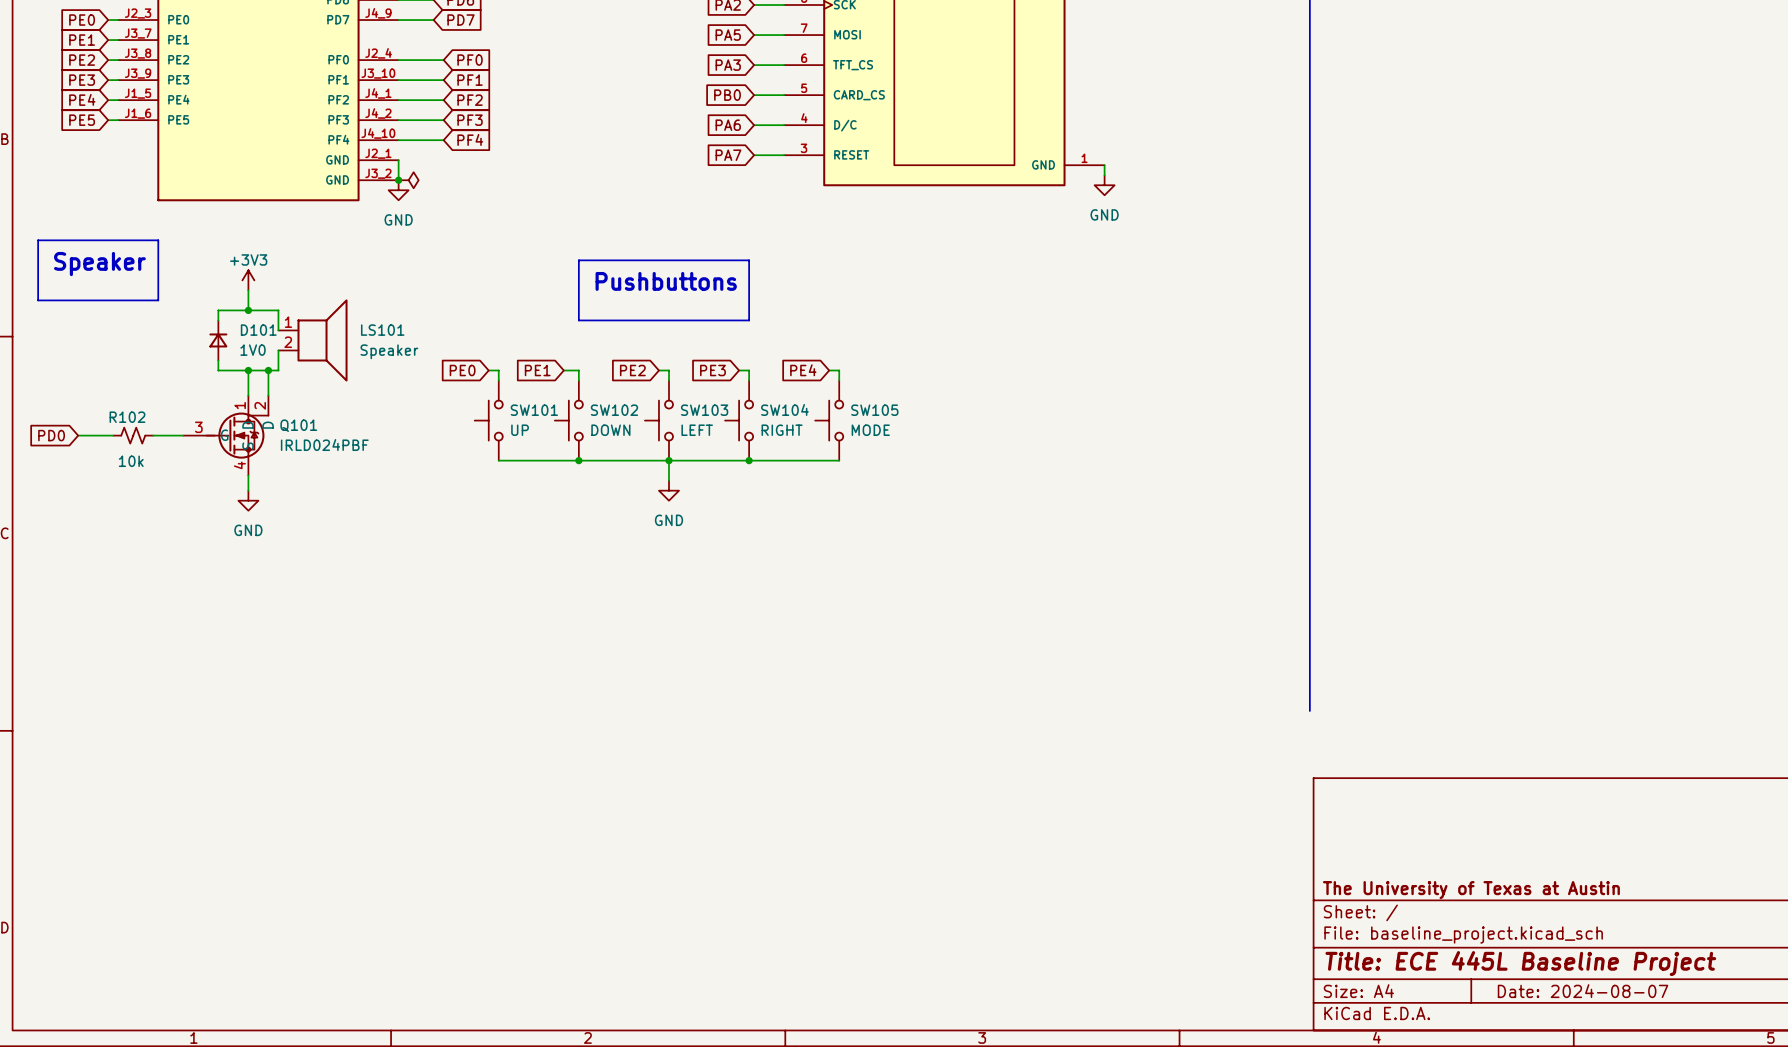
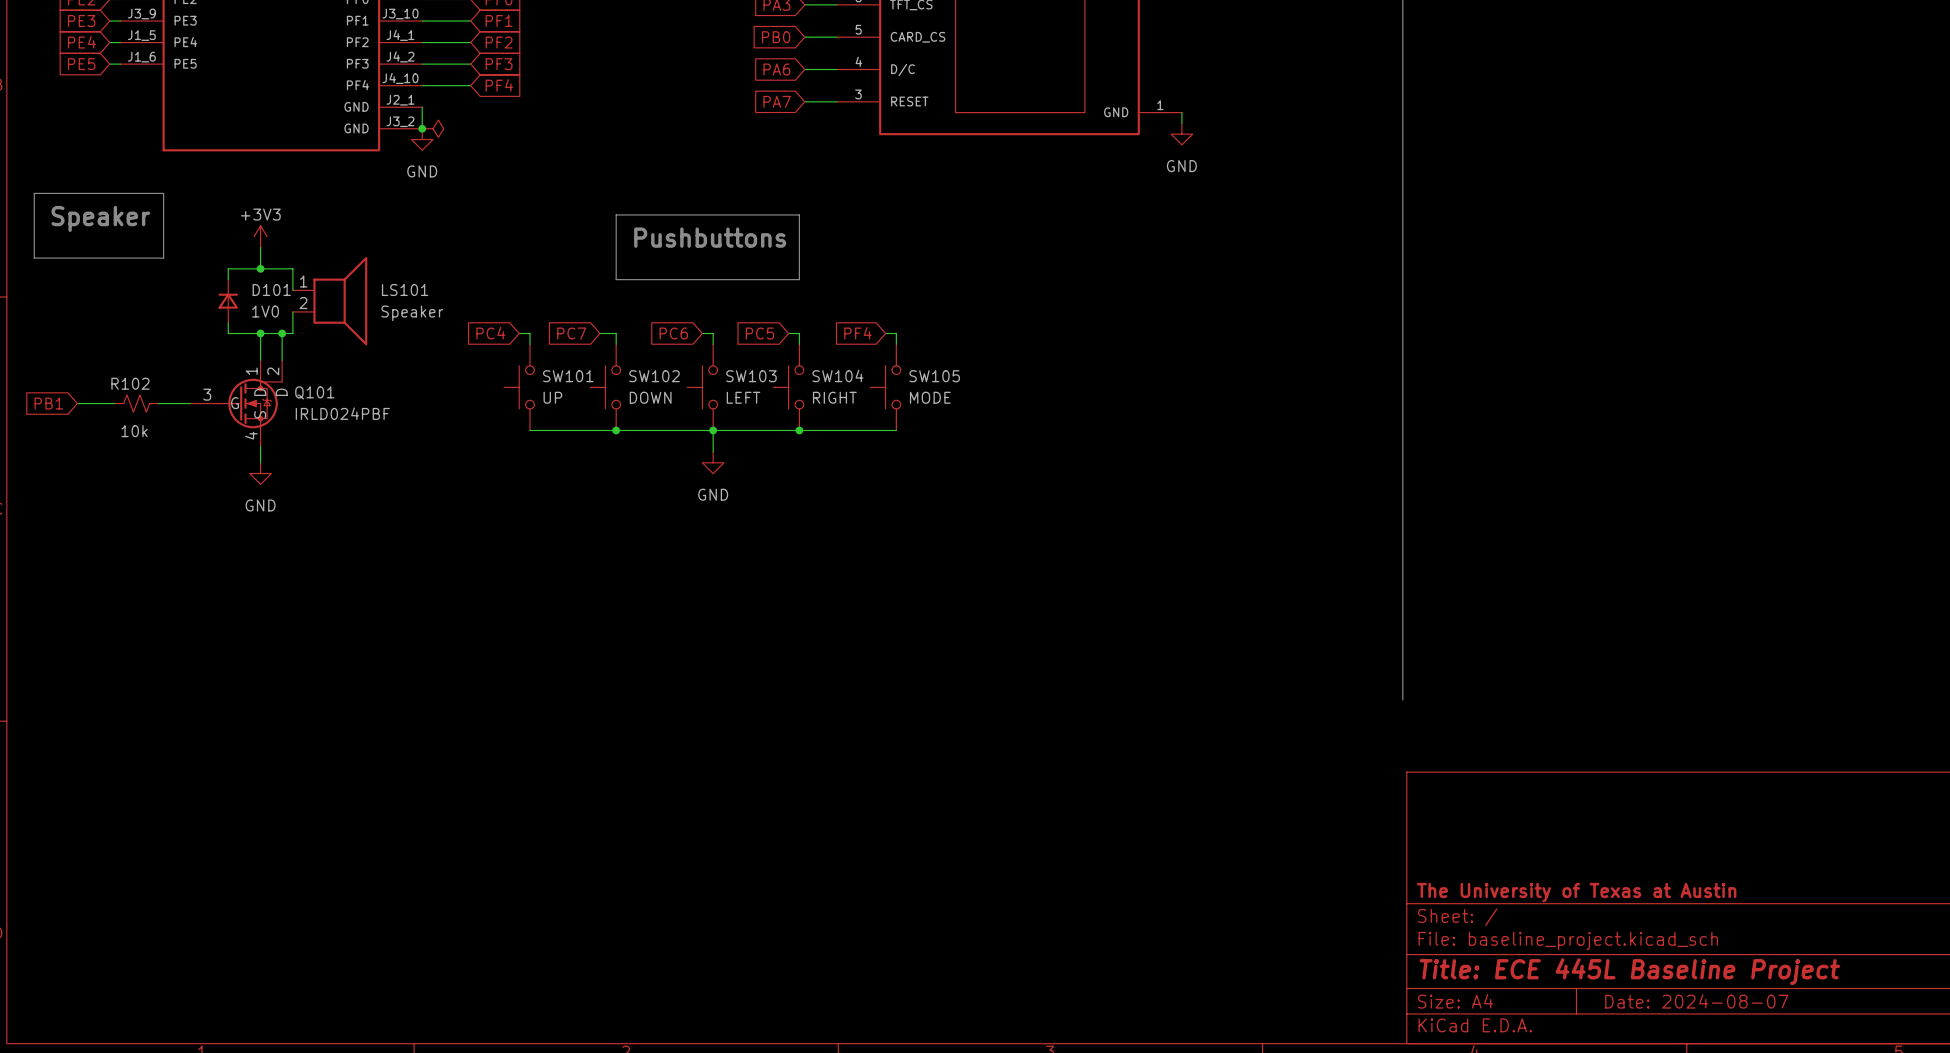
global label: PE0 (462, 370) -> PC4 (490, 333)
global label: PE1 (537, 370) -> PC7 (571, 333)
global label: PE2 (632, 370) -> PC6 (673, 333)
global label: PE3 (712, 370) -> PC5 (759, 333)
global label: PE4 (803, 370) -> PF4 (857, 333)
global label: PD0 (51, 435) -> PB1 (48, 403)

